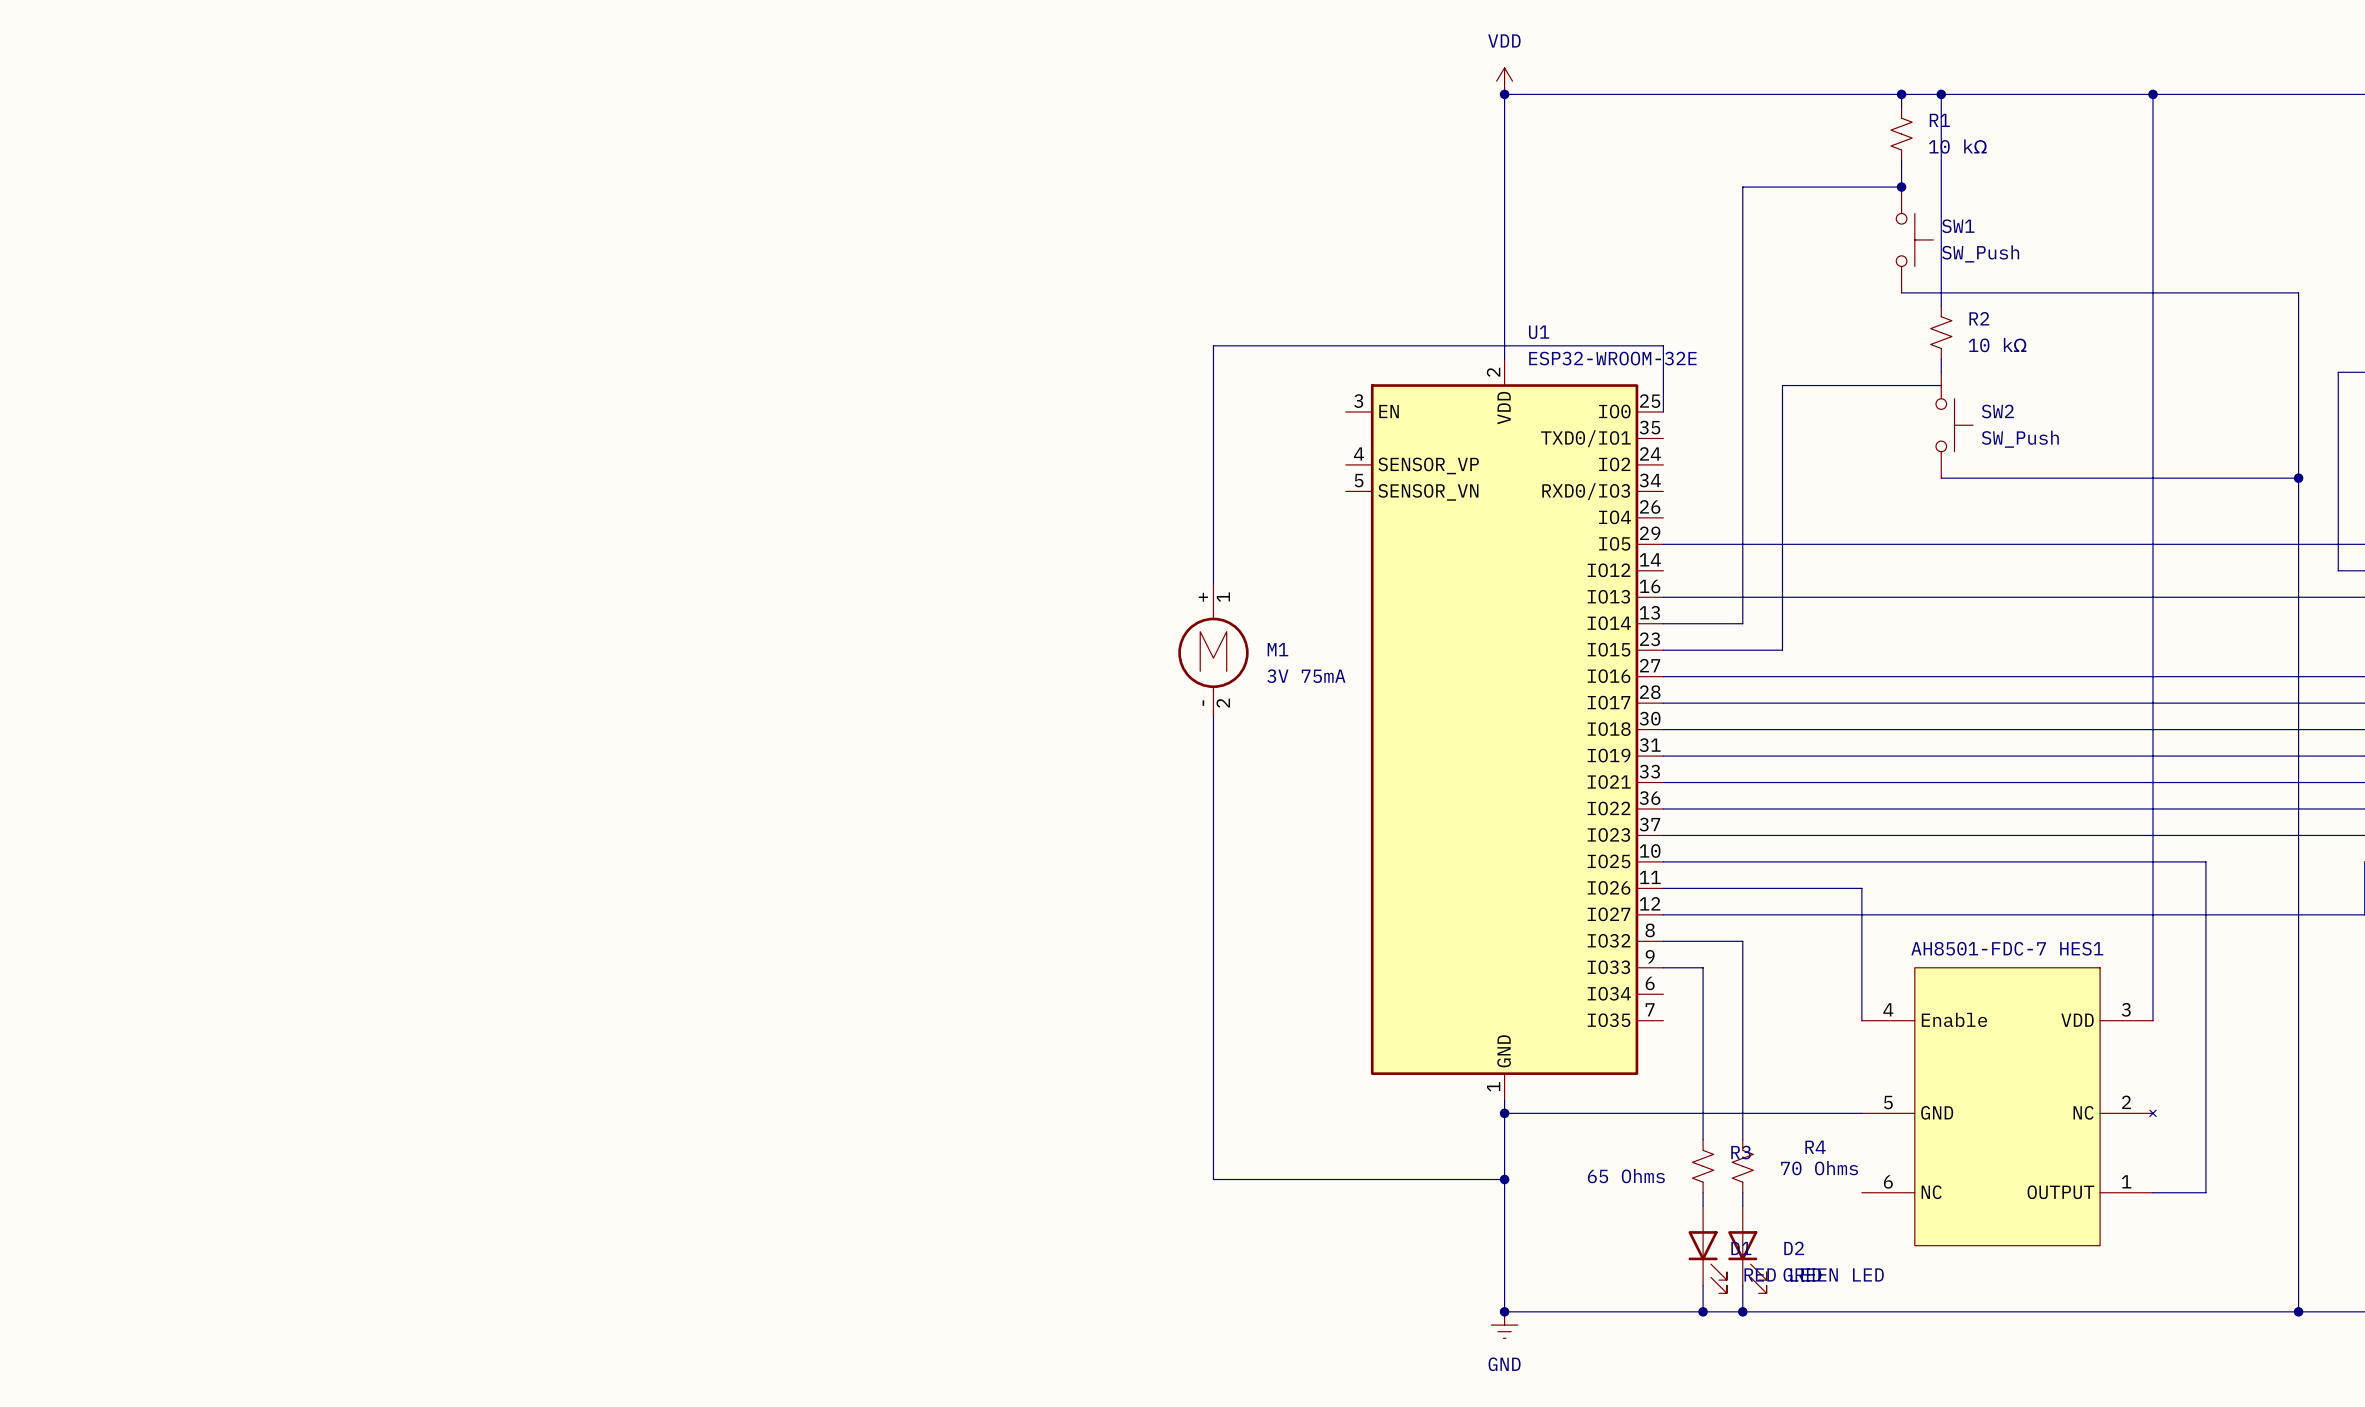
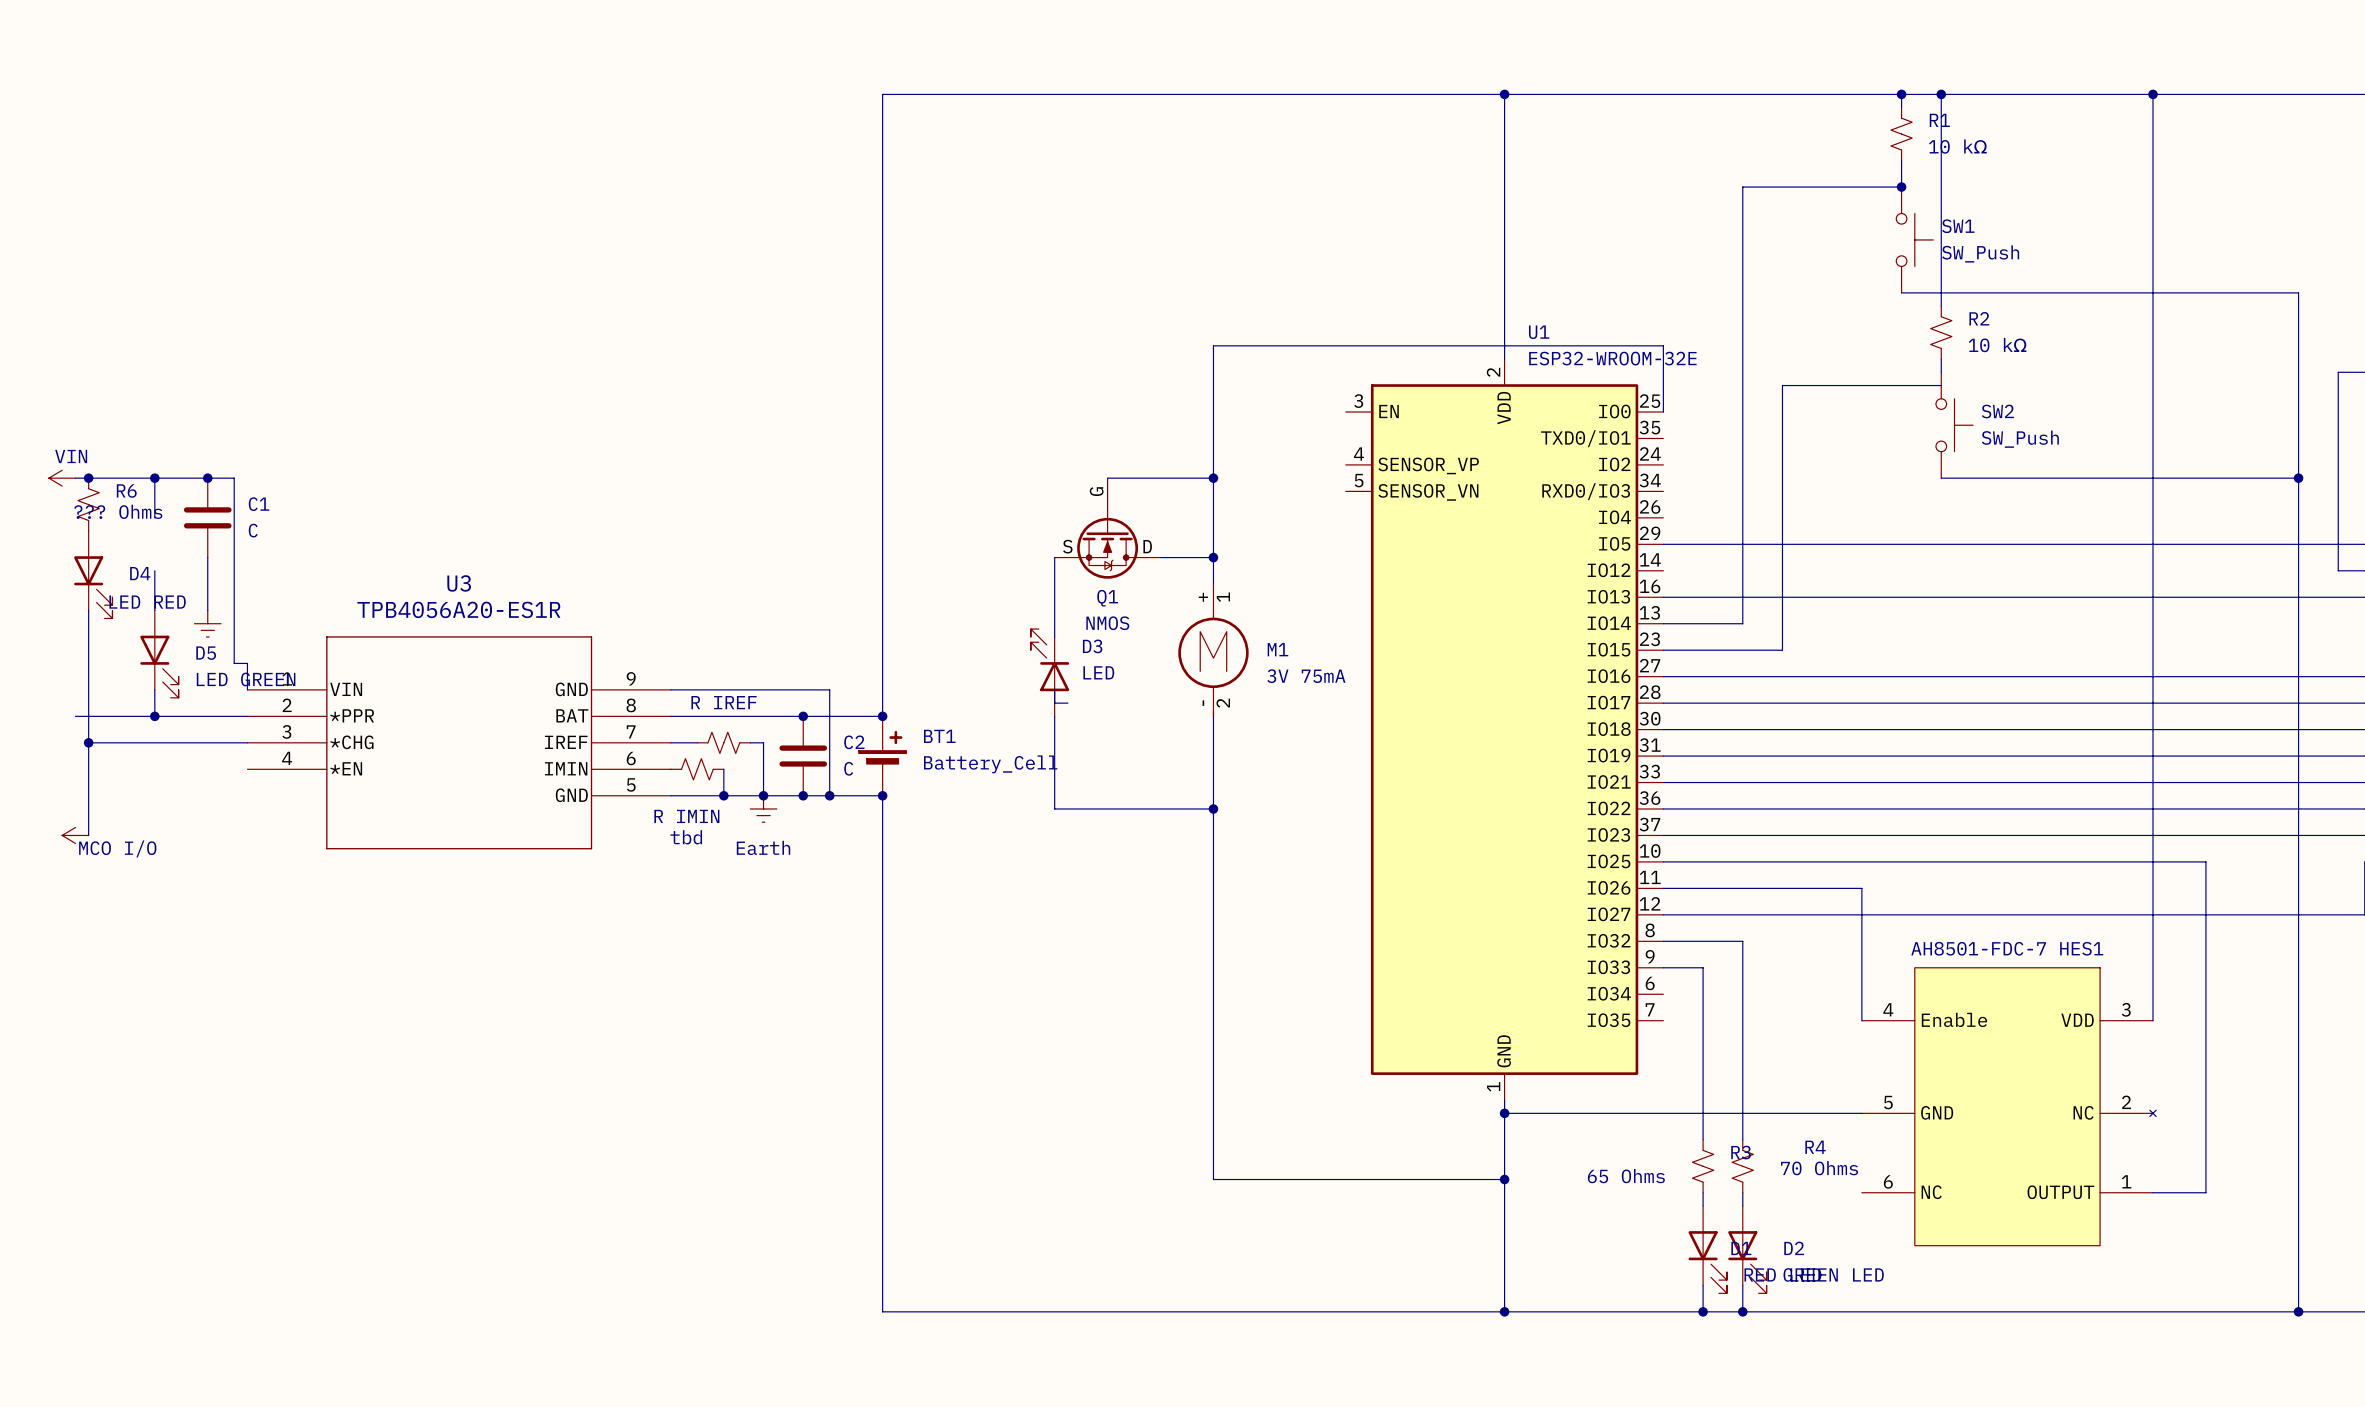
power symbol: VDD (1504, 81) -> none
wire: none -> (1504, 94) (882, 94) (882, 716) (670, 716)
power symbol: none -> VIN (62, 478)
wire: none -> (75, 478) (234, 478) (234, 663) (247, 663) (247, 689)
junction: none -> (88, 478)
wire: none -> (154, 478) (154, 517)
junction: none -> (154, 478)
junction: none -> (207, 478)
wire: none -> (1107, 478) (1213, 478)
junction: none -> (1213, 478)
R6: none -> ??? Ohms (88, 504)
C1: none -> C (207, 517)
Q1: none -> NMOS (1107, 528)
wire: none -> (207, 557) (207, 610)
wire: none -> (1054, 557) (1054, 636)
wire: none -> (1160, 557) (1213, 557)
junction: none -> (1213, 557)
wire: none -> (154, 570) (154, 610)
D4: none -> LED RED (93, 574)
wire: none -> (88, 610) (88, 835)
power symbol: none -> (207, 623)
D5: none -> LED GREEN (159, 654)
D3: none -> LED (1050, 672)
wire: none -> (154, 689) (154, 716)
wire: none -> (670, 689) (829, 689) (829, 795)
wire: none -> (1054, 689) (1054, 703) (1067, 703)
wire: none -> (75, 716) (247, 716)
junction: none -> (154, 716)
junction: none -> (803, 716)
junction: none -> (882, 716)
wire: none -> (1054, 716) (1054, 808) (1213, 808)
wire: none -> (88, 742) (247, 742)
junction: none -> (88, 742)
U3: none -> TPB4056A20-ES1R (459, 742)
wire: none -> (670, 742) (697, 742)
R IREF: none -> (723, 742)
wire: none -> (750, 742) (763, 742) (763, 795)
C2: none -> C (803, 756)
BT1: none -> Battery_Cell (882, 756)
R IMIN: none -> tbd (697, 769)
wire: none -> (723, 769) (723, 795)
wire: none -> (670, 795) (882, 795) (882, 1311) (1504, 1311)
junction: none -> (723, 795)
junction: none -> (763, 795)
junction: none -> (803, 795)
junction: none -> (829, 795)
junction: none -> (882, 795)
power symbol: none -> Earth (763, 808)
junction: none -> (1213, 808)
power symbol: none -> MCO I/O (75, 835)
power symbol: GND (1504, 1325) -> none

